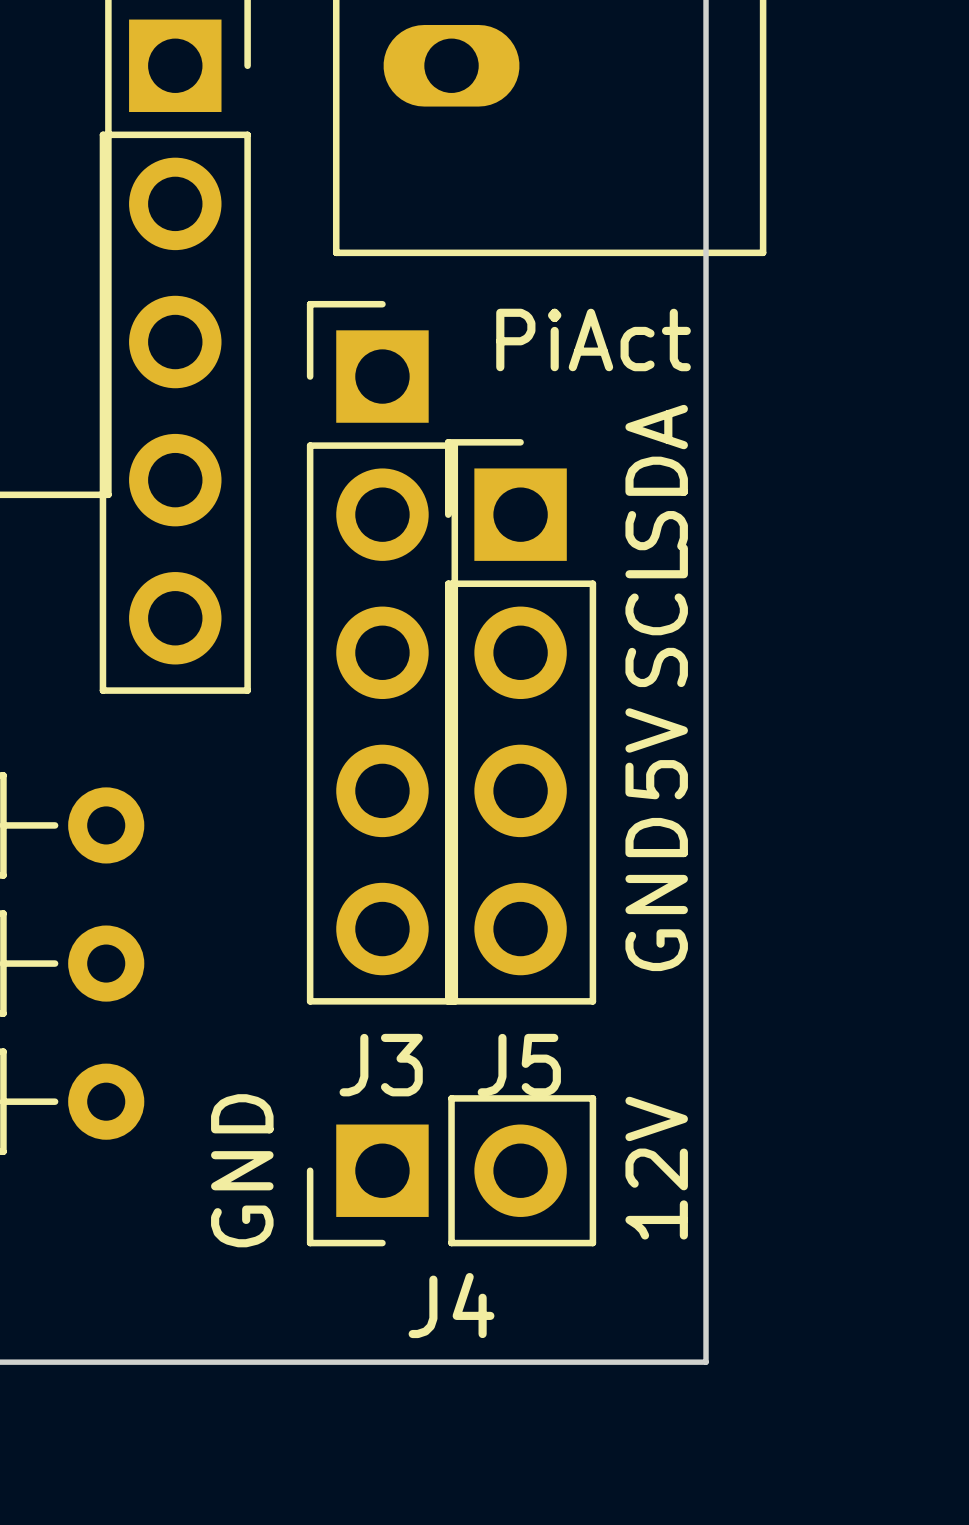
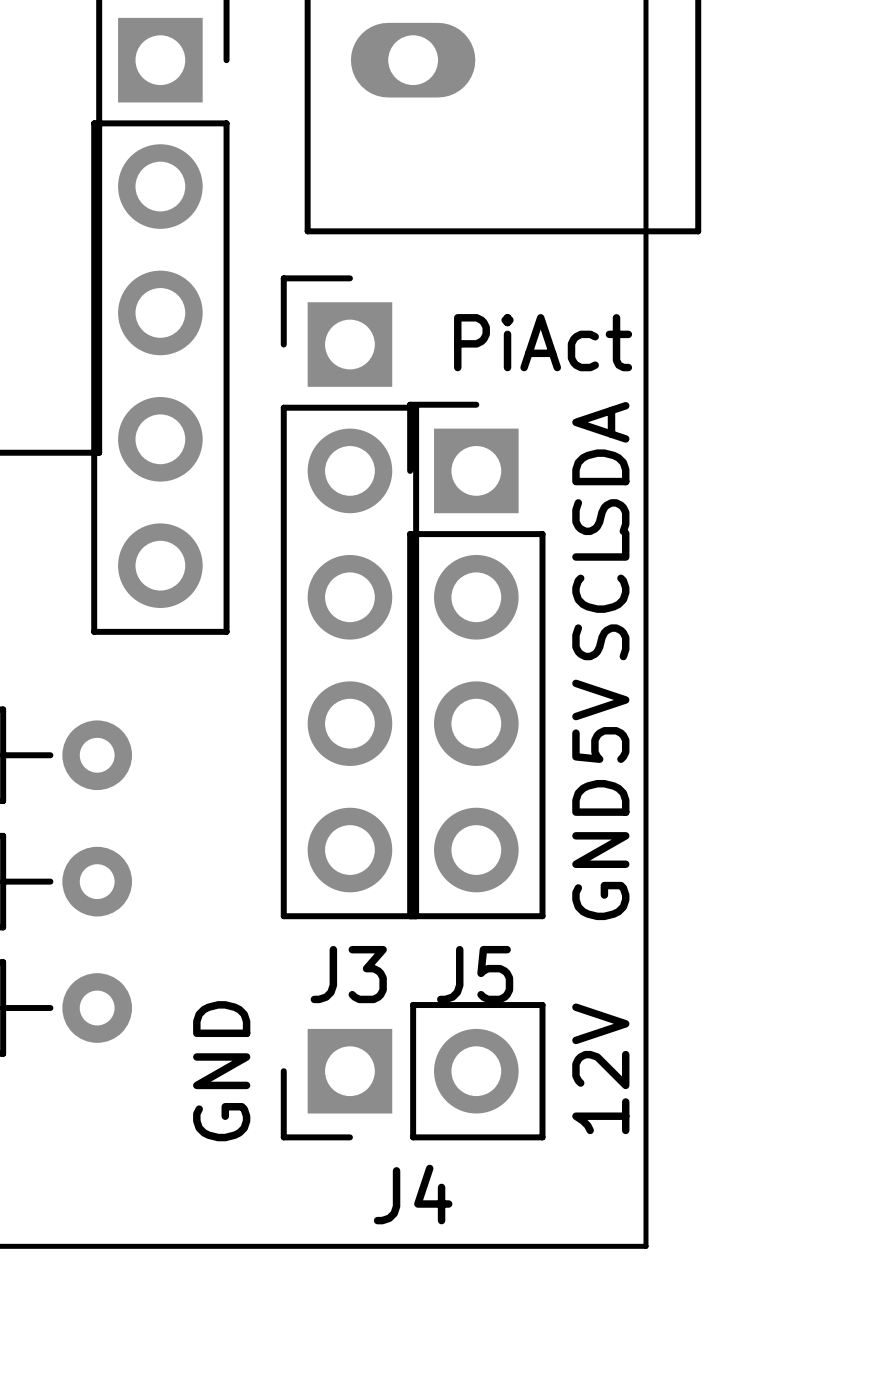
text position: PiAct (593, 339) -> PiAct (543, 342)
text position: SDA (656, 477) -> SDA (600, 468)
text position: SCL (656, 615) -> SCL (600, 594)
text position: 5V (656, 753) -> 5V (600, 721)
text position: GND (656, 894) -> GND (600, 850)

